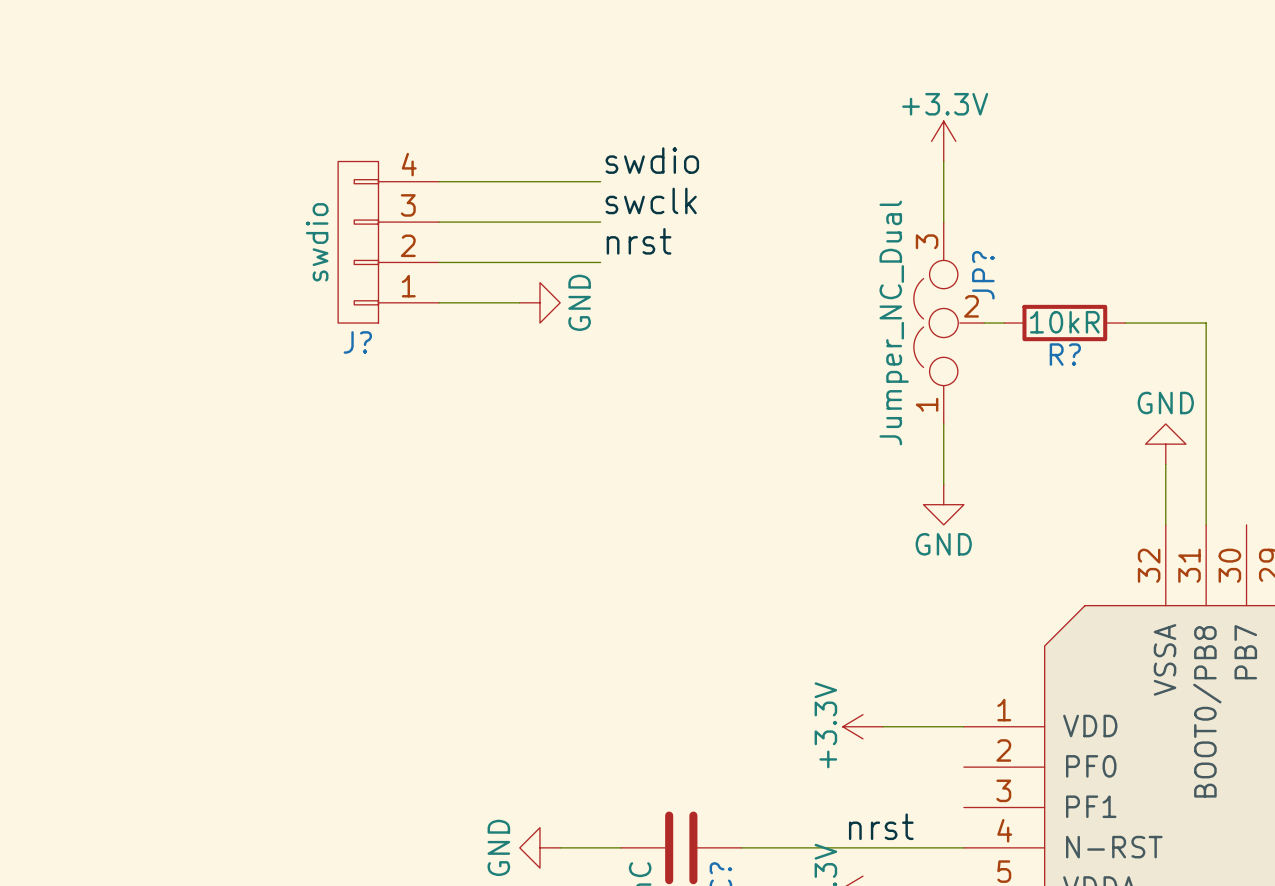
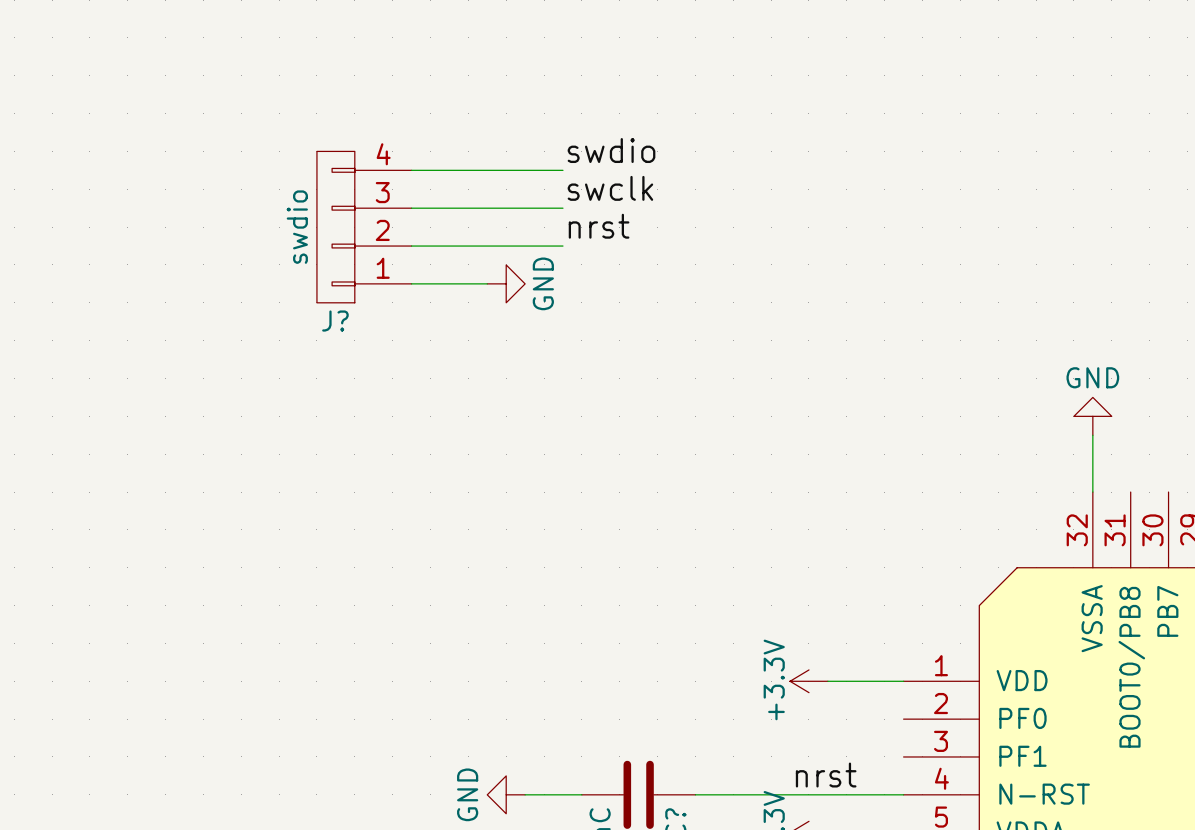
power symbol: +3.3V (943, 141) -> none
wire: (943, 161) (943, 222) -> none
JP?: Jumper_NC_Dual (948, 323) -> none
wire: (984, 323) (1004, 323) -> none
R?: 10kR (1064, 323) -> none
wire: (1125, 323) (1206, 323) (1206, 524) -> none
wire: (943, 423) (943, 484) -> none
power symbol: GND (943, 504) -> none

